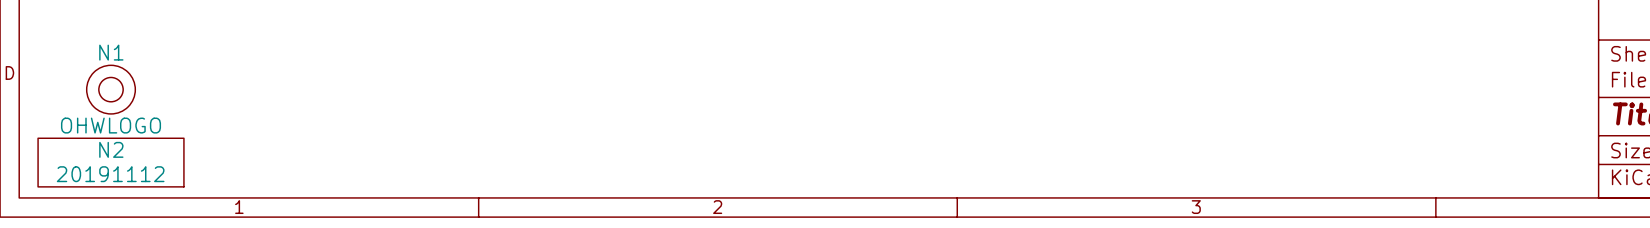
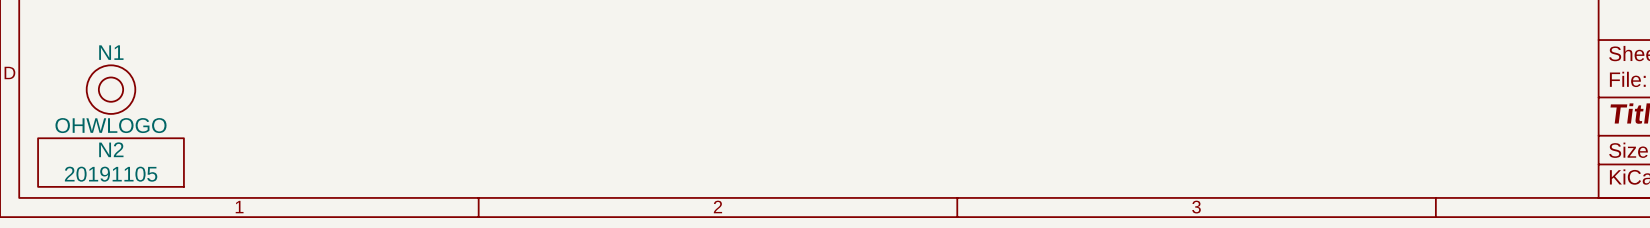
N2 value: 20191112 (110, 174) -> 20191105 (111, 174)

